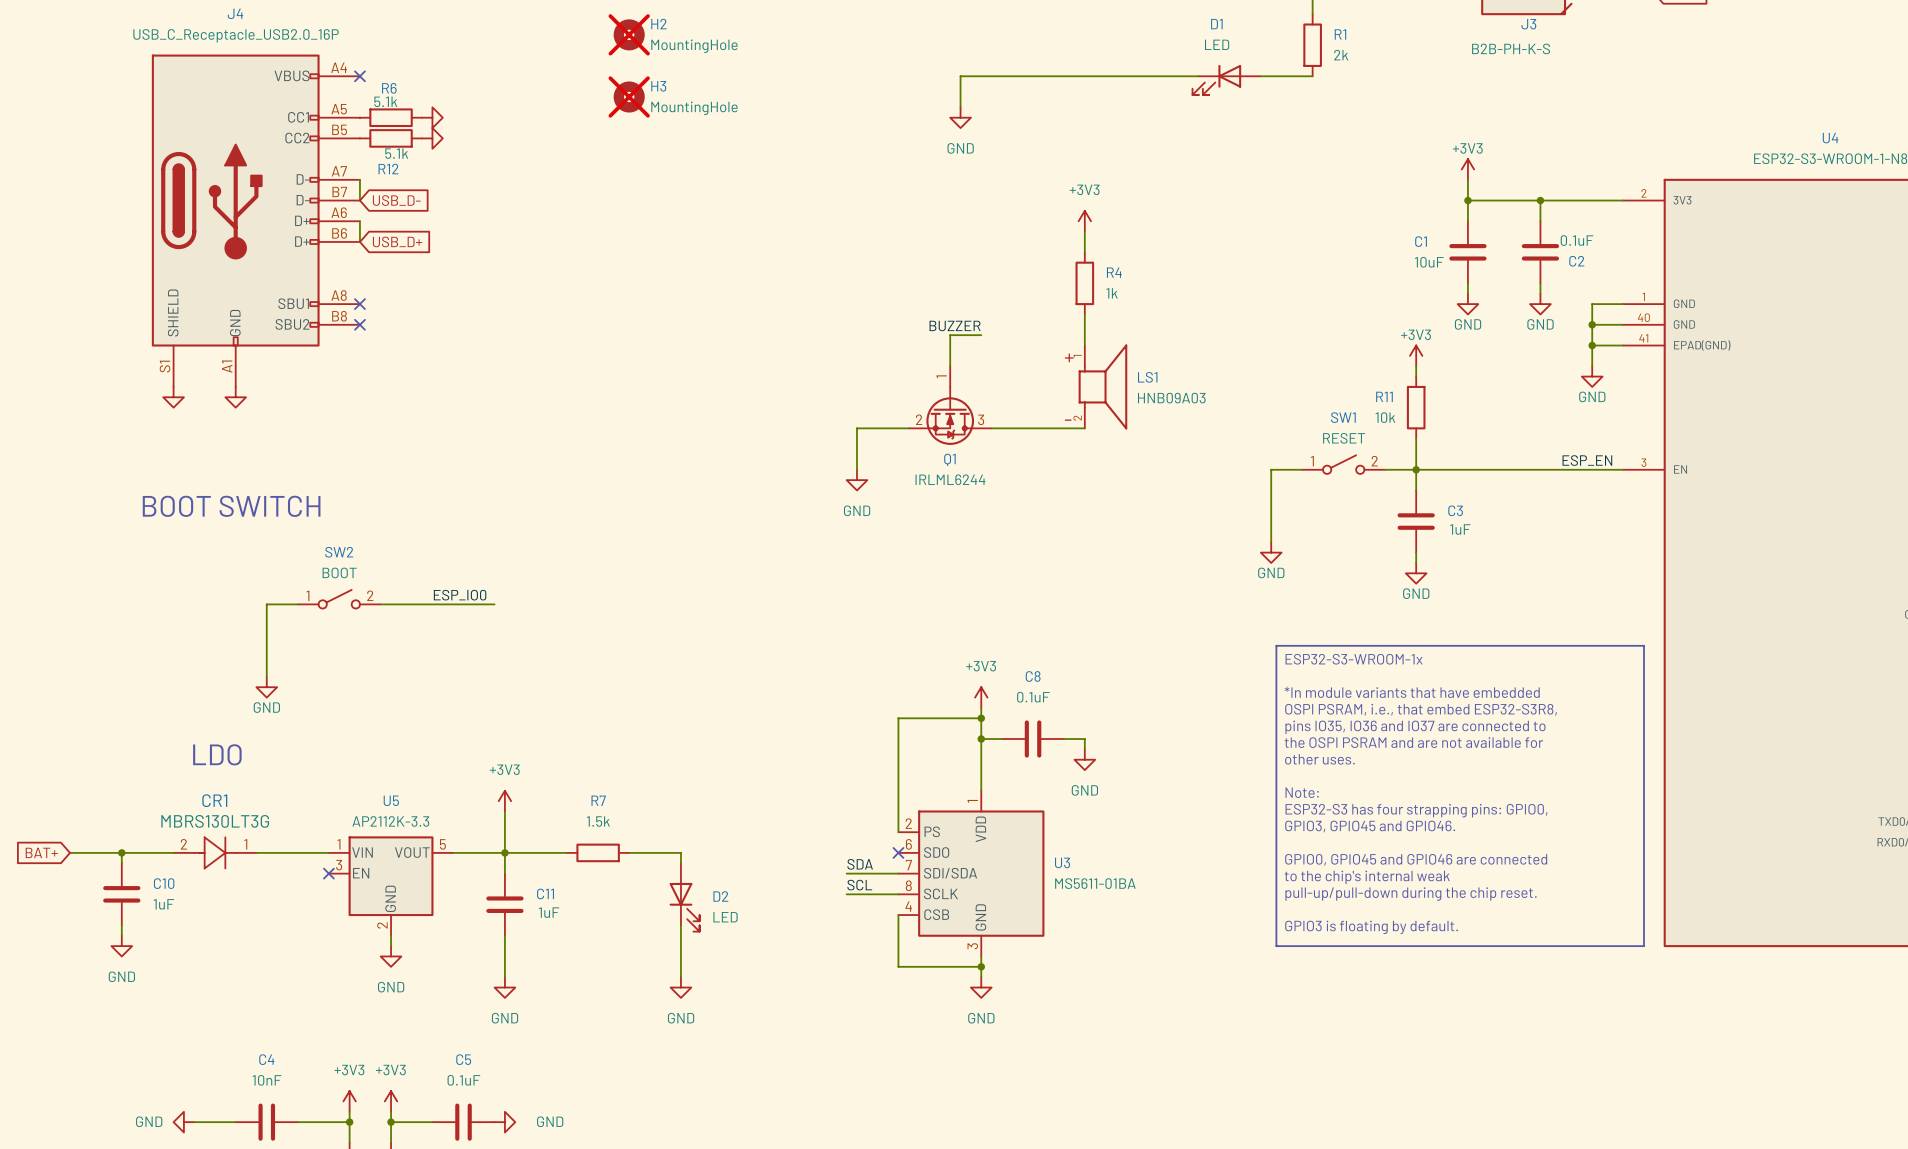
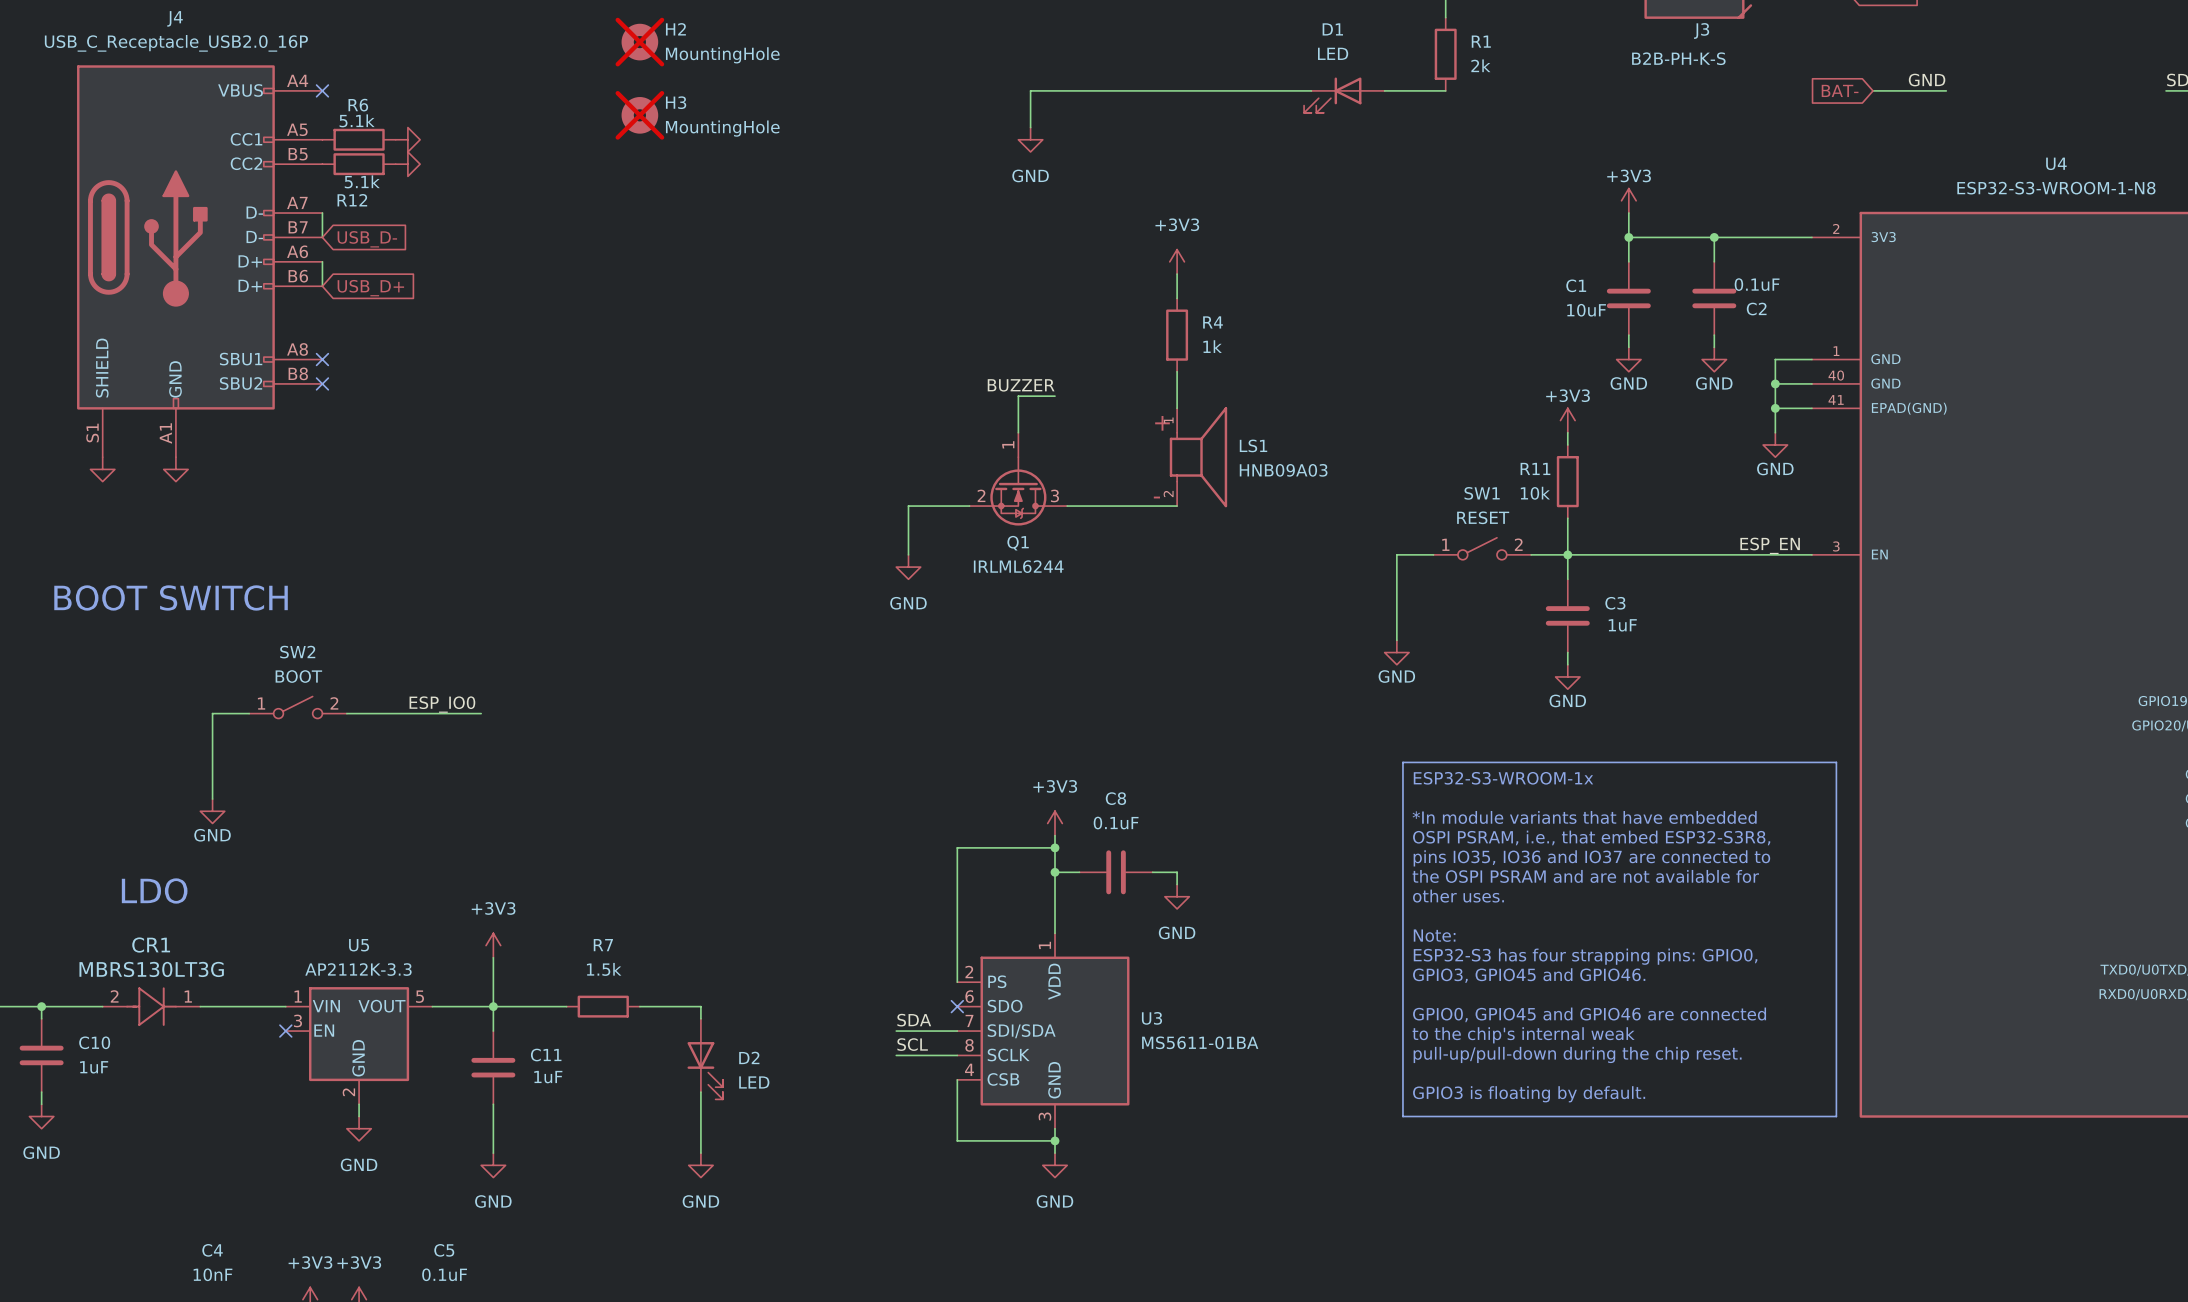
label: none -> GND (1927, 80)
global label: none -> BAT- (1840, 90)
wire: none -> (1873, 90) (1946, 90)

